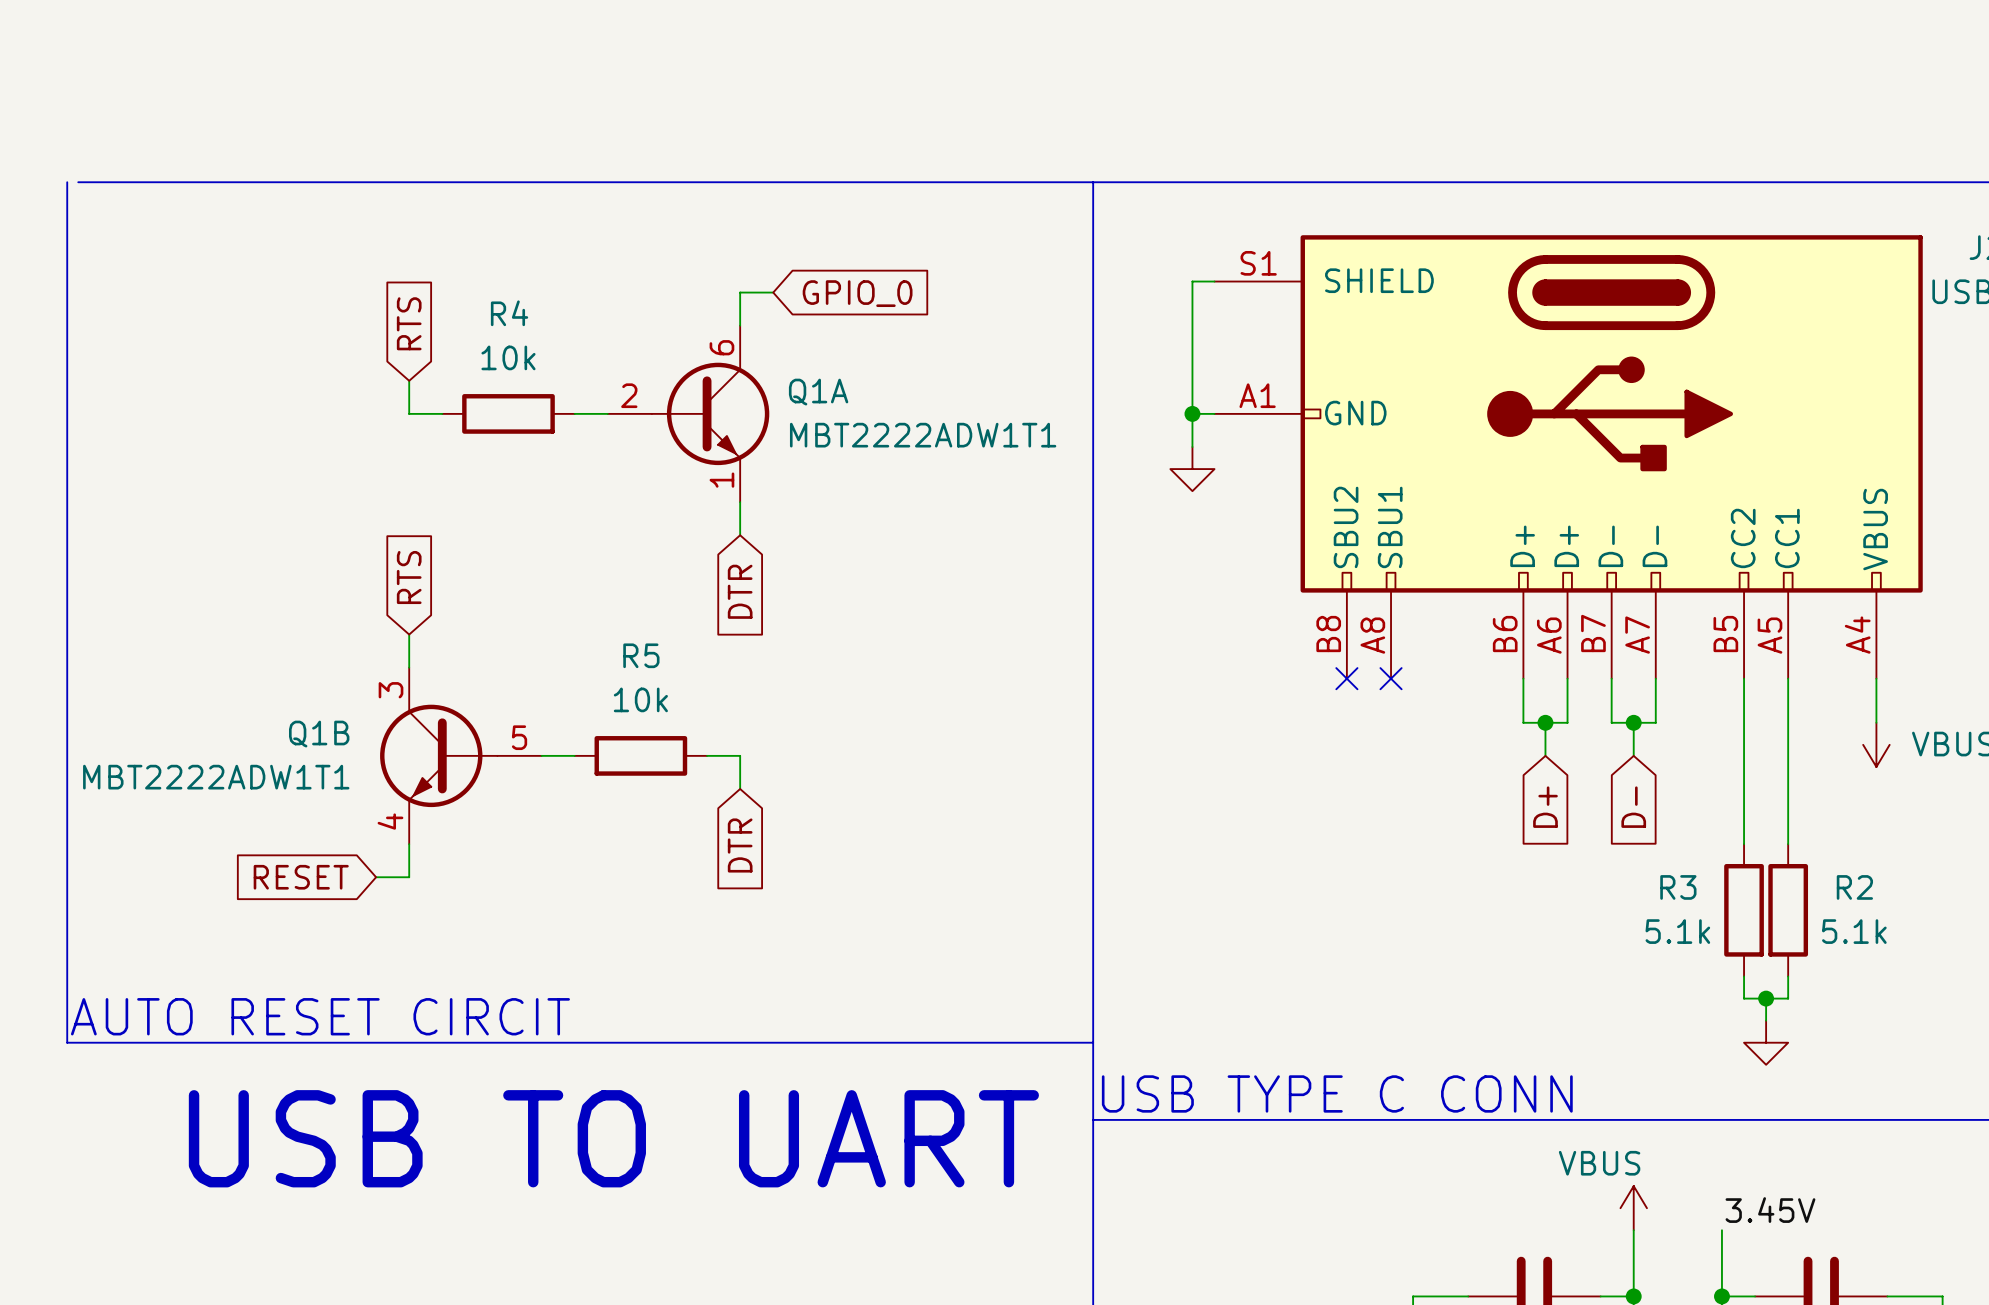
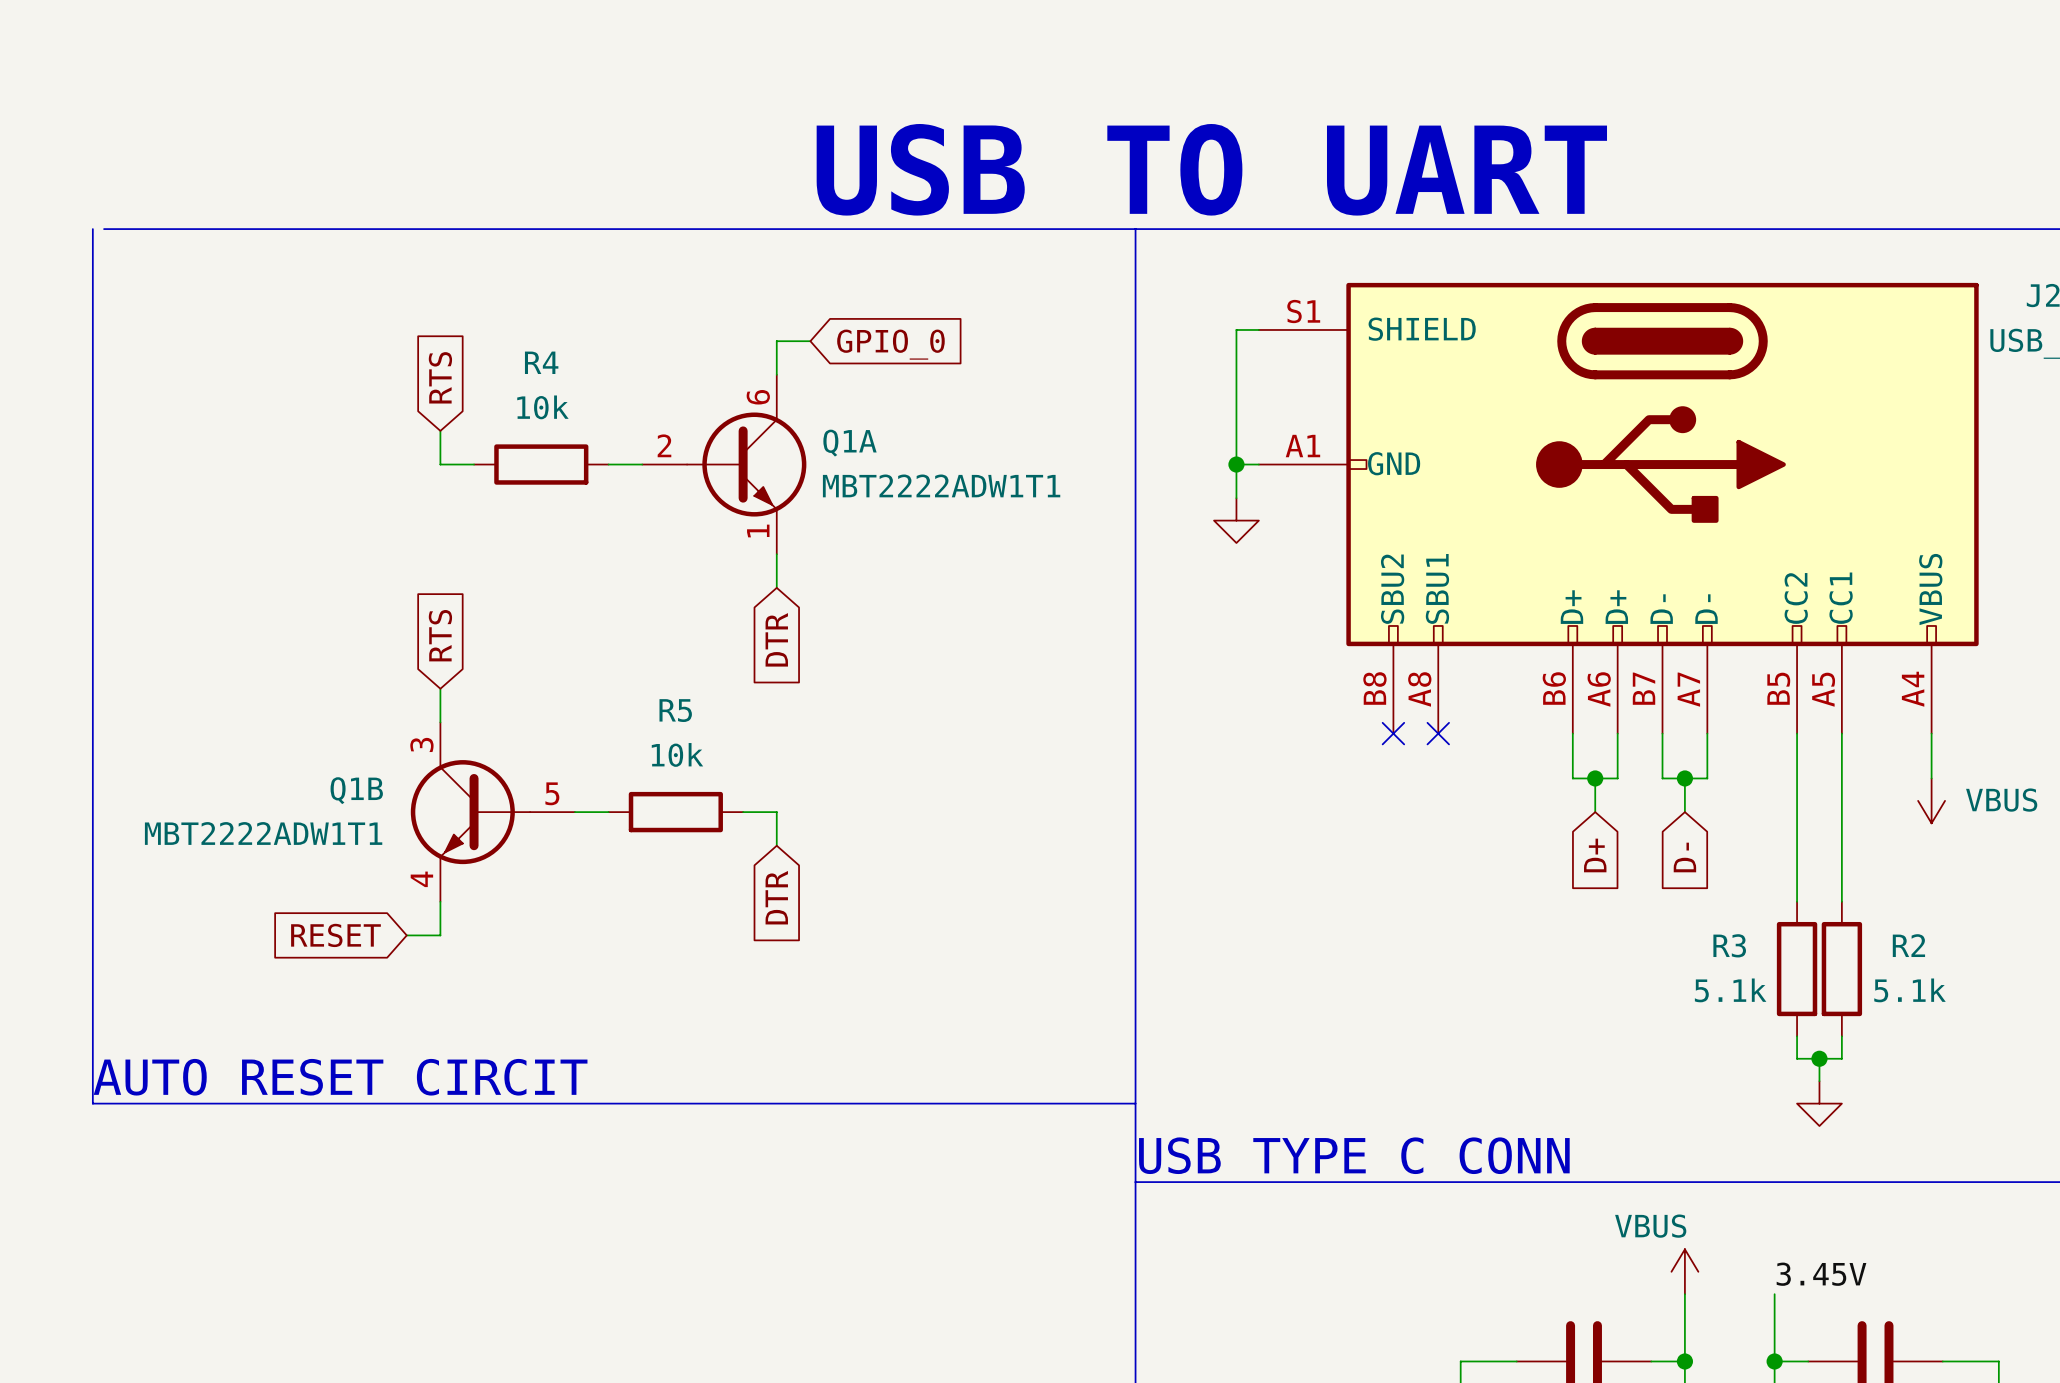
text: none -> USB TO UART (1211, 169)
text: USB TO UART (613, 1138) -> none

